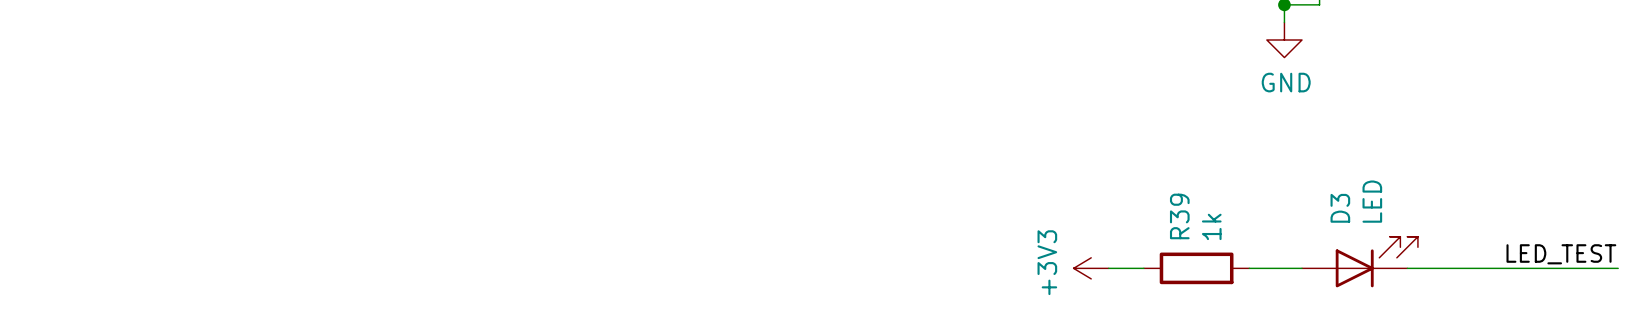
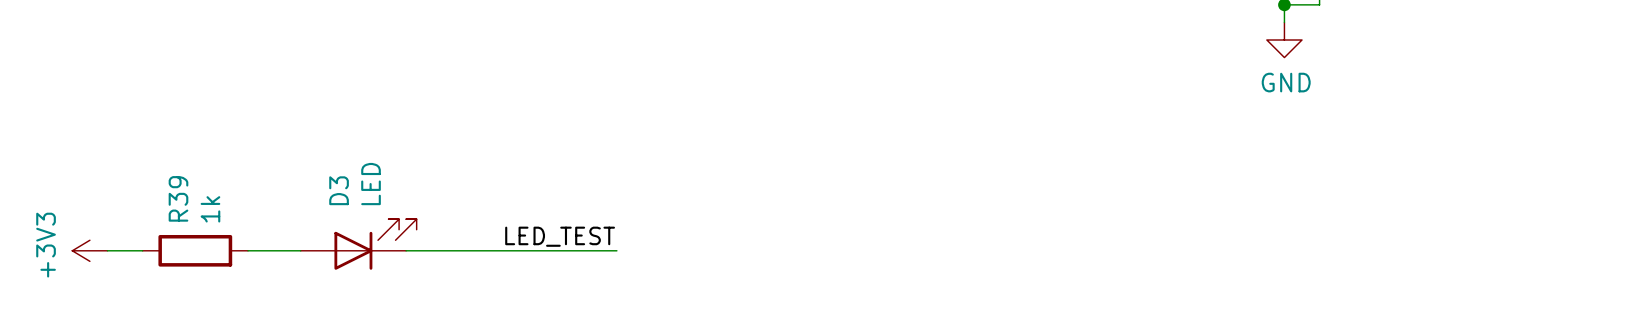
label: none -> LED_TEST (560, 236)
power symbol: none -> +3V3 (89, 250)
wire: none -> (107, 250) (142, 250)
wire: none -> (248, 250) (300, 250)
wire: none -> (406, 250) (616, 250)
label: LED_TEST (1561, 254) -> none
D3 position: (1359, 262) -> (358, 244)
power symbol: +3V3 (1091, 268) -> none
wire: (1108, 268) (1143, 268) -> none
R39 position: (1196, 268) -> (195, 250)
wire: (1249, 268) (1302, 268) -> none
wire: (1407, 268) (1618, 268) -> none

